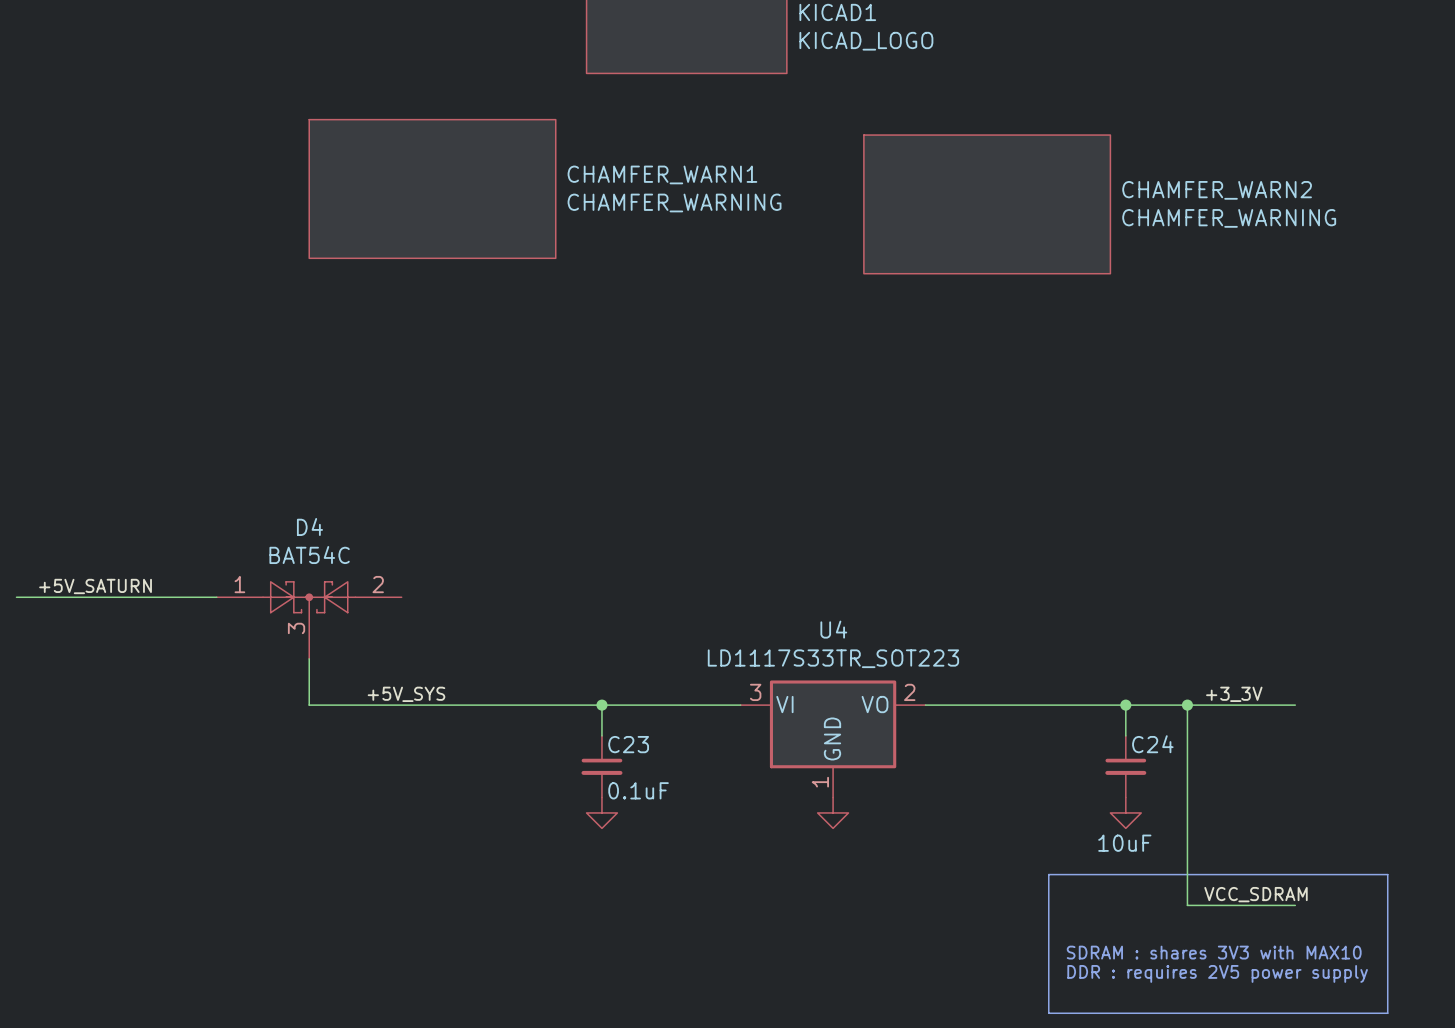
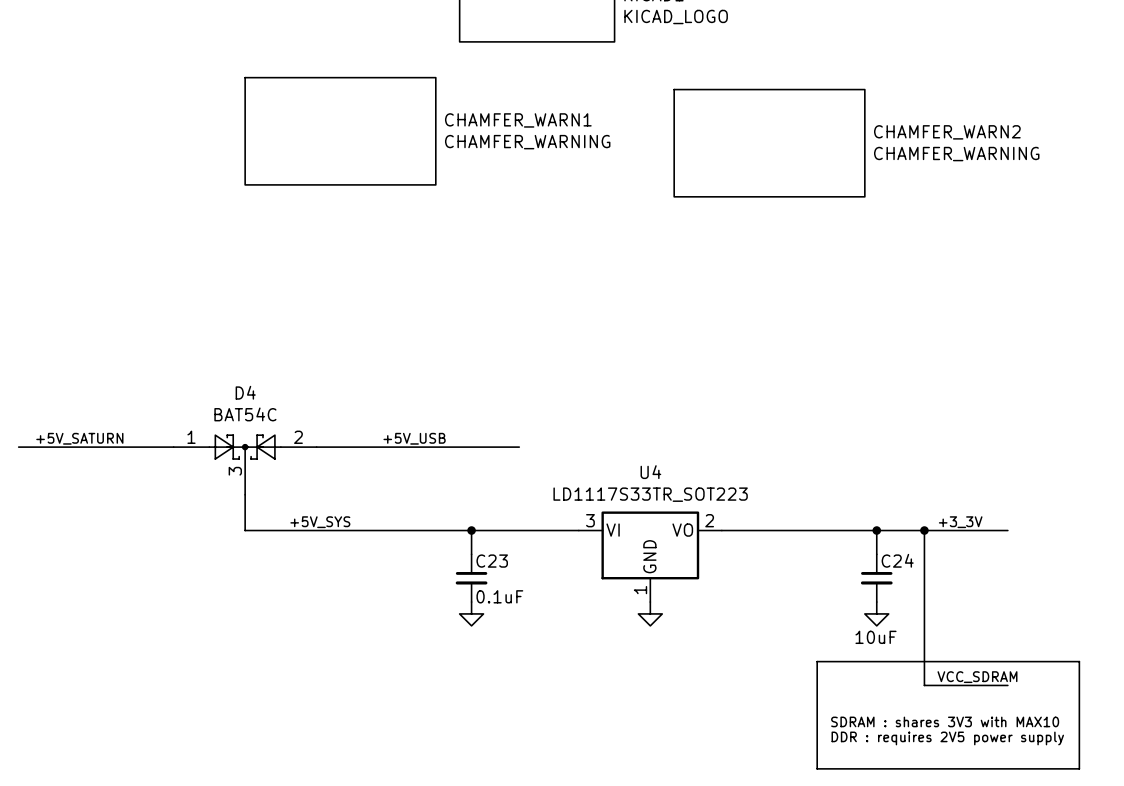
label: none -> +5V_USB (414, 438)
wire: none -> (316, 447) (519, 447)

